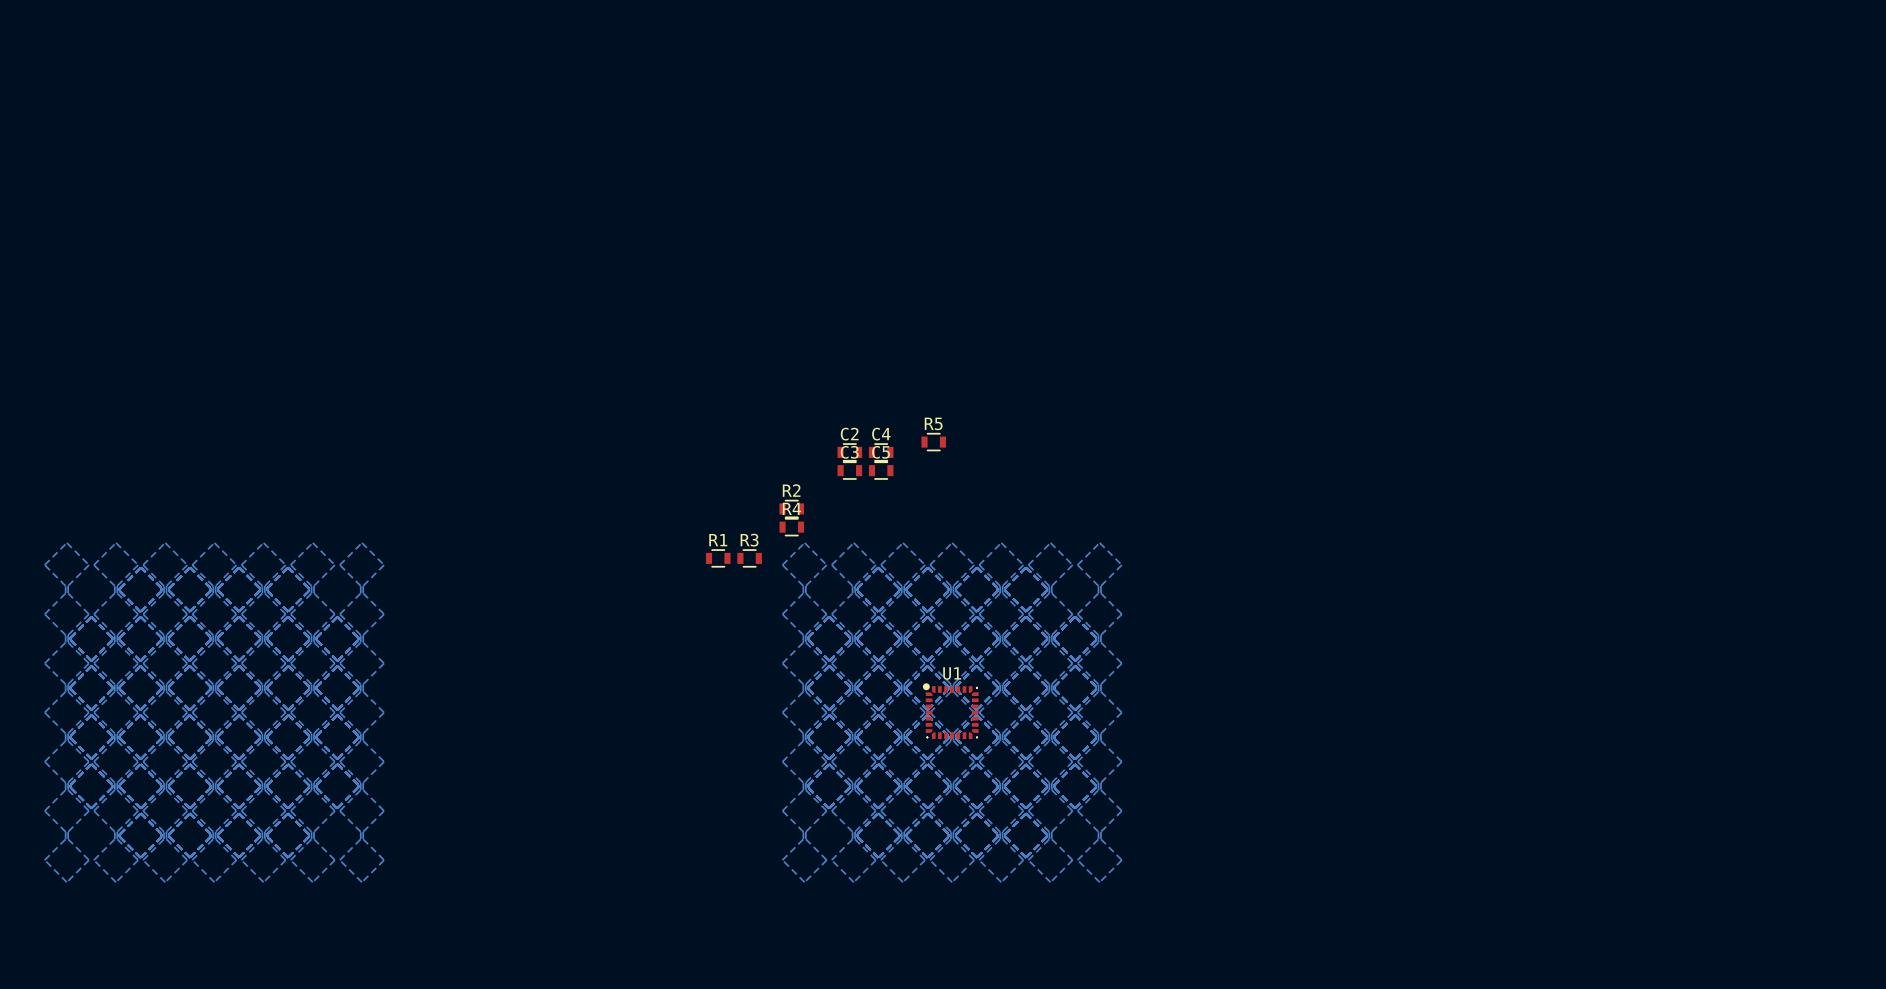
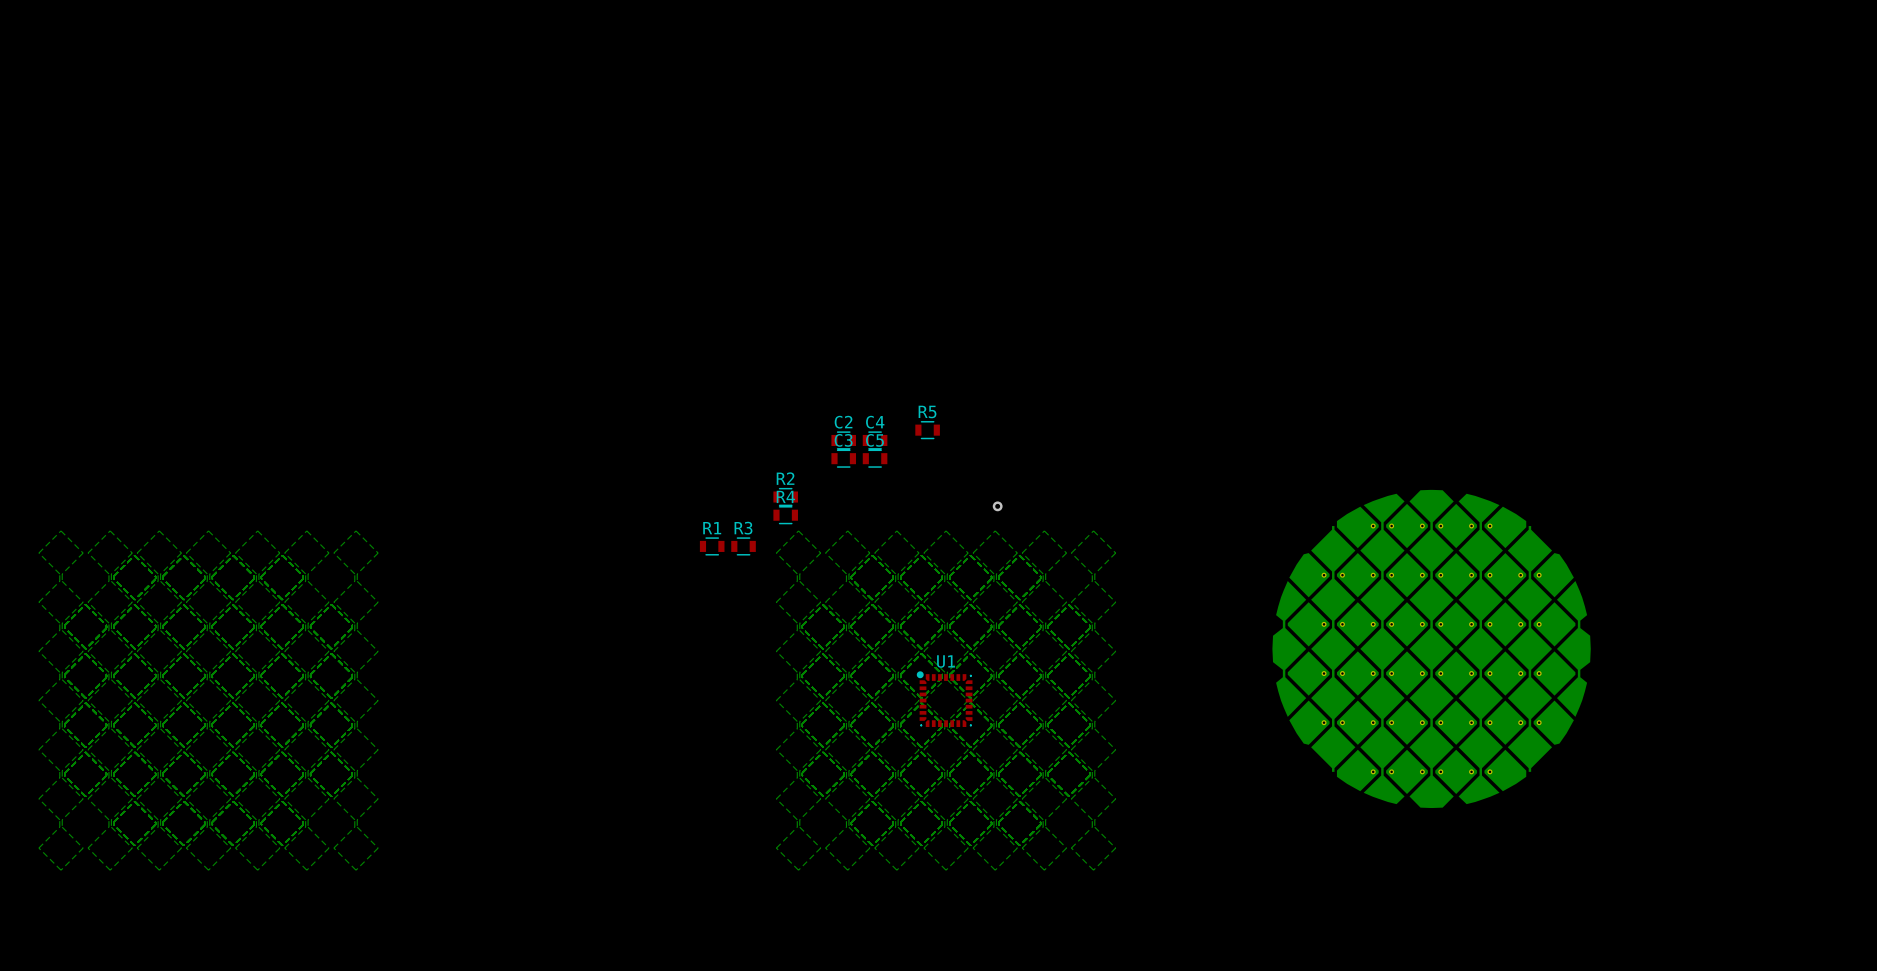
via: none -> (997, 506)
part: none -> (1431, 648)

